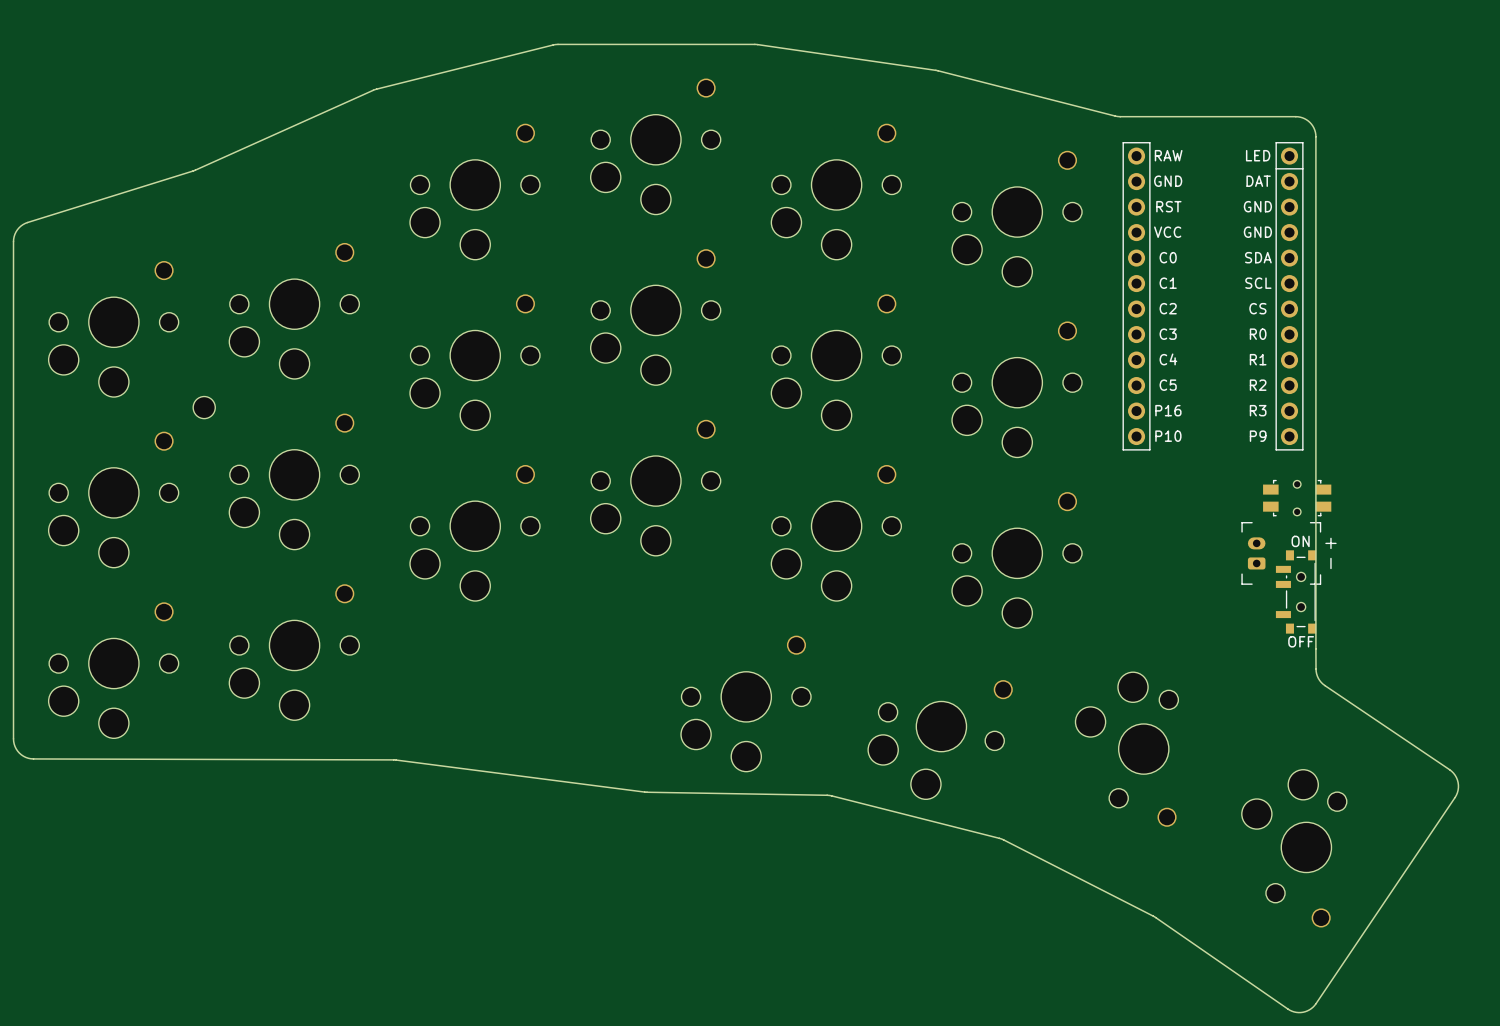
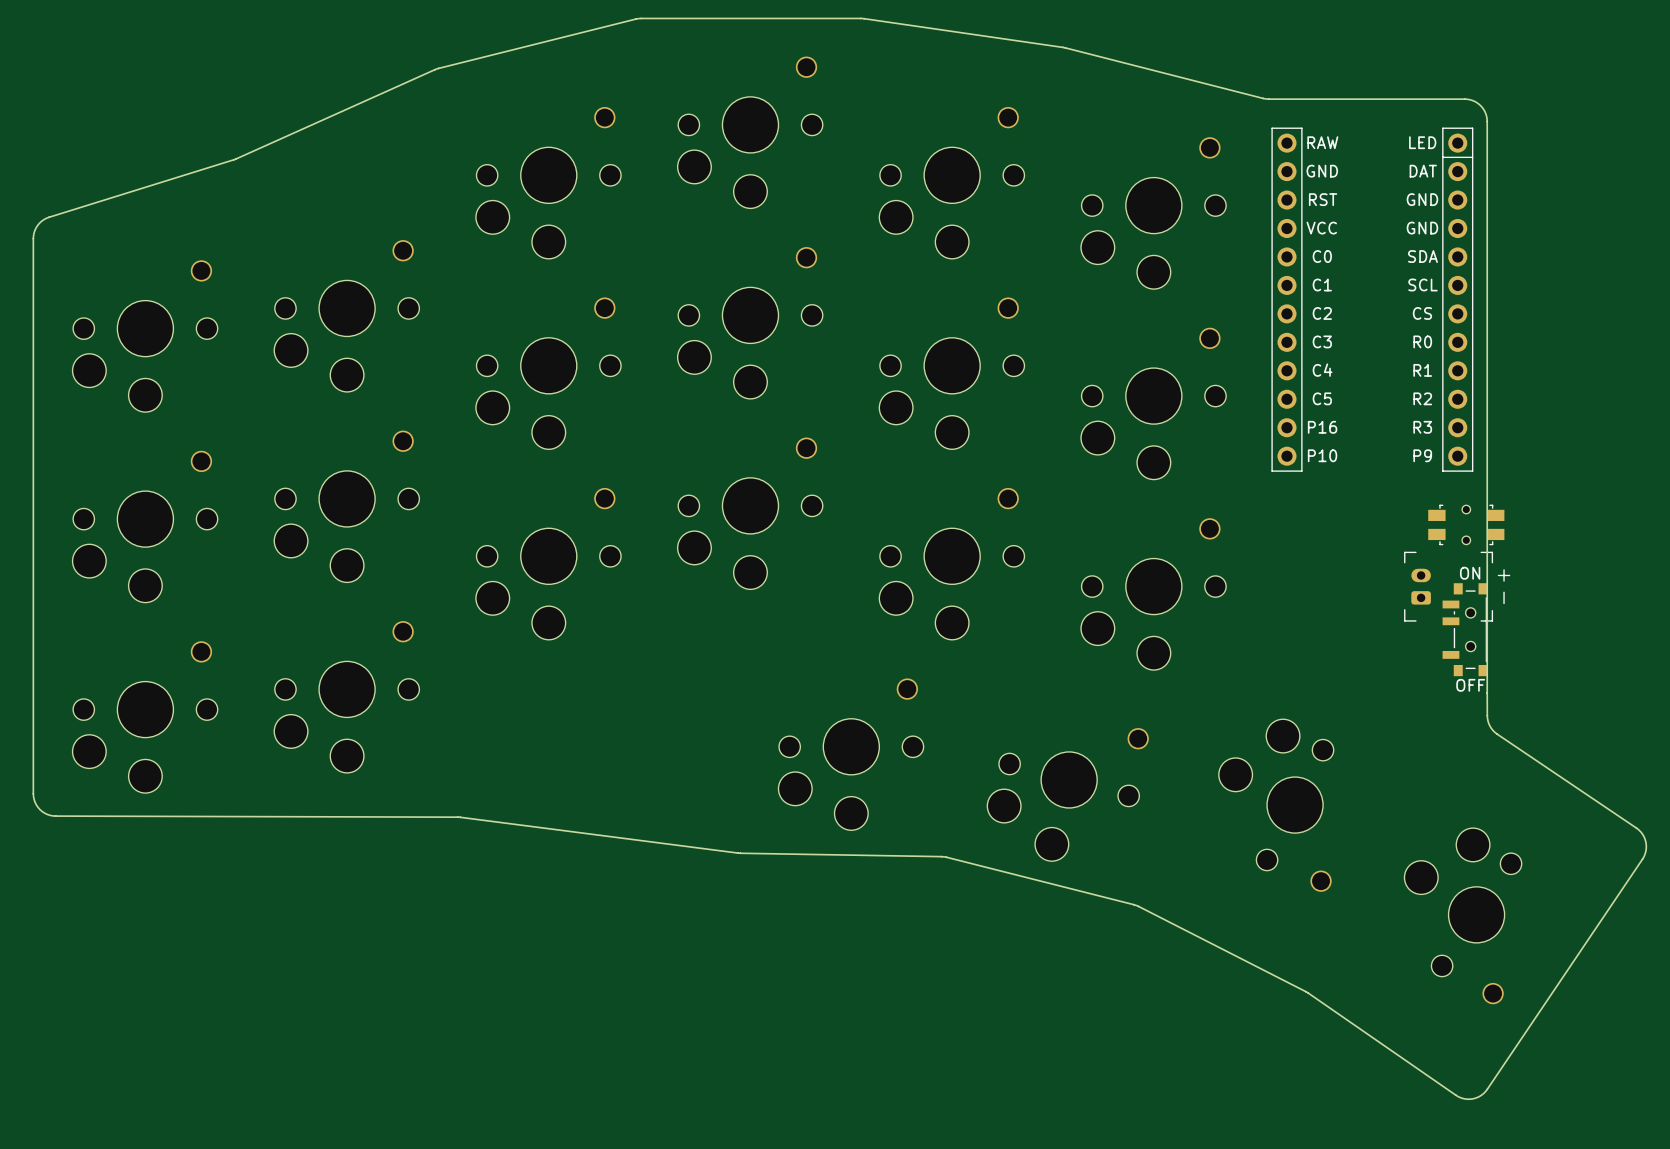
part: (204, 407) -> none

